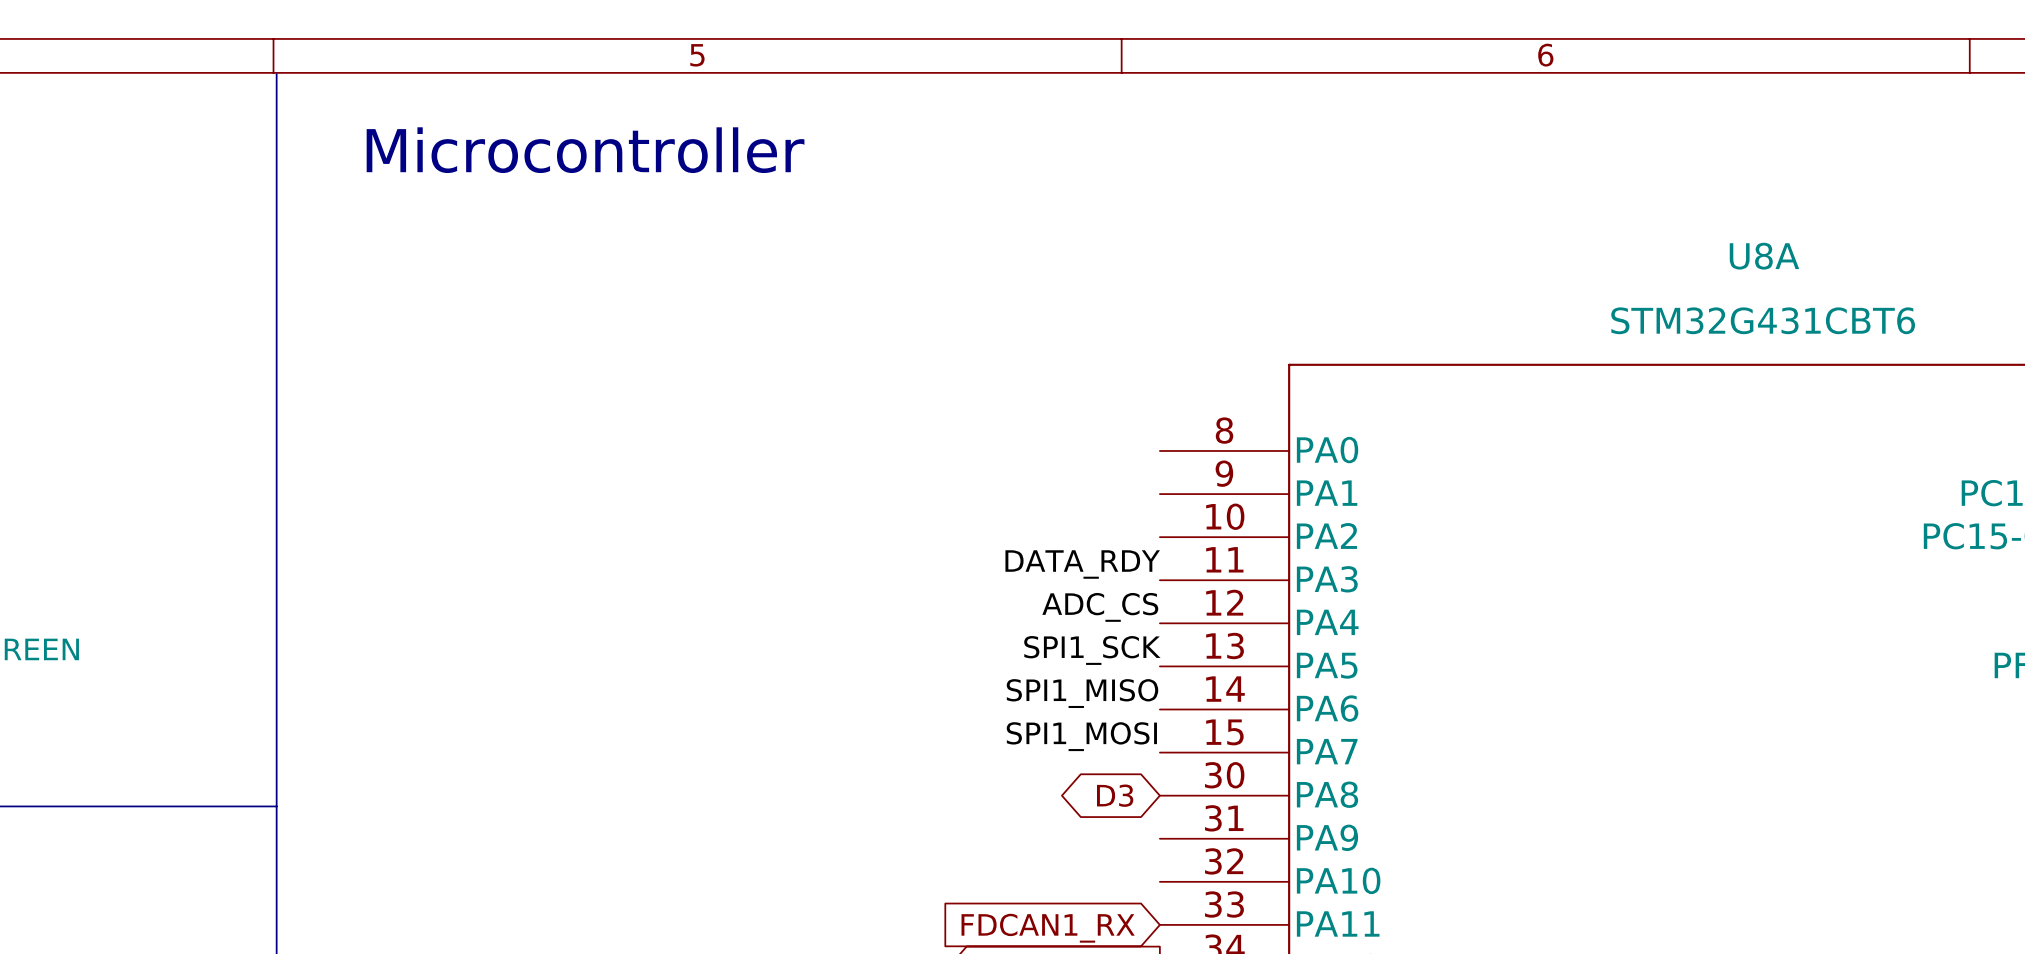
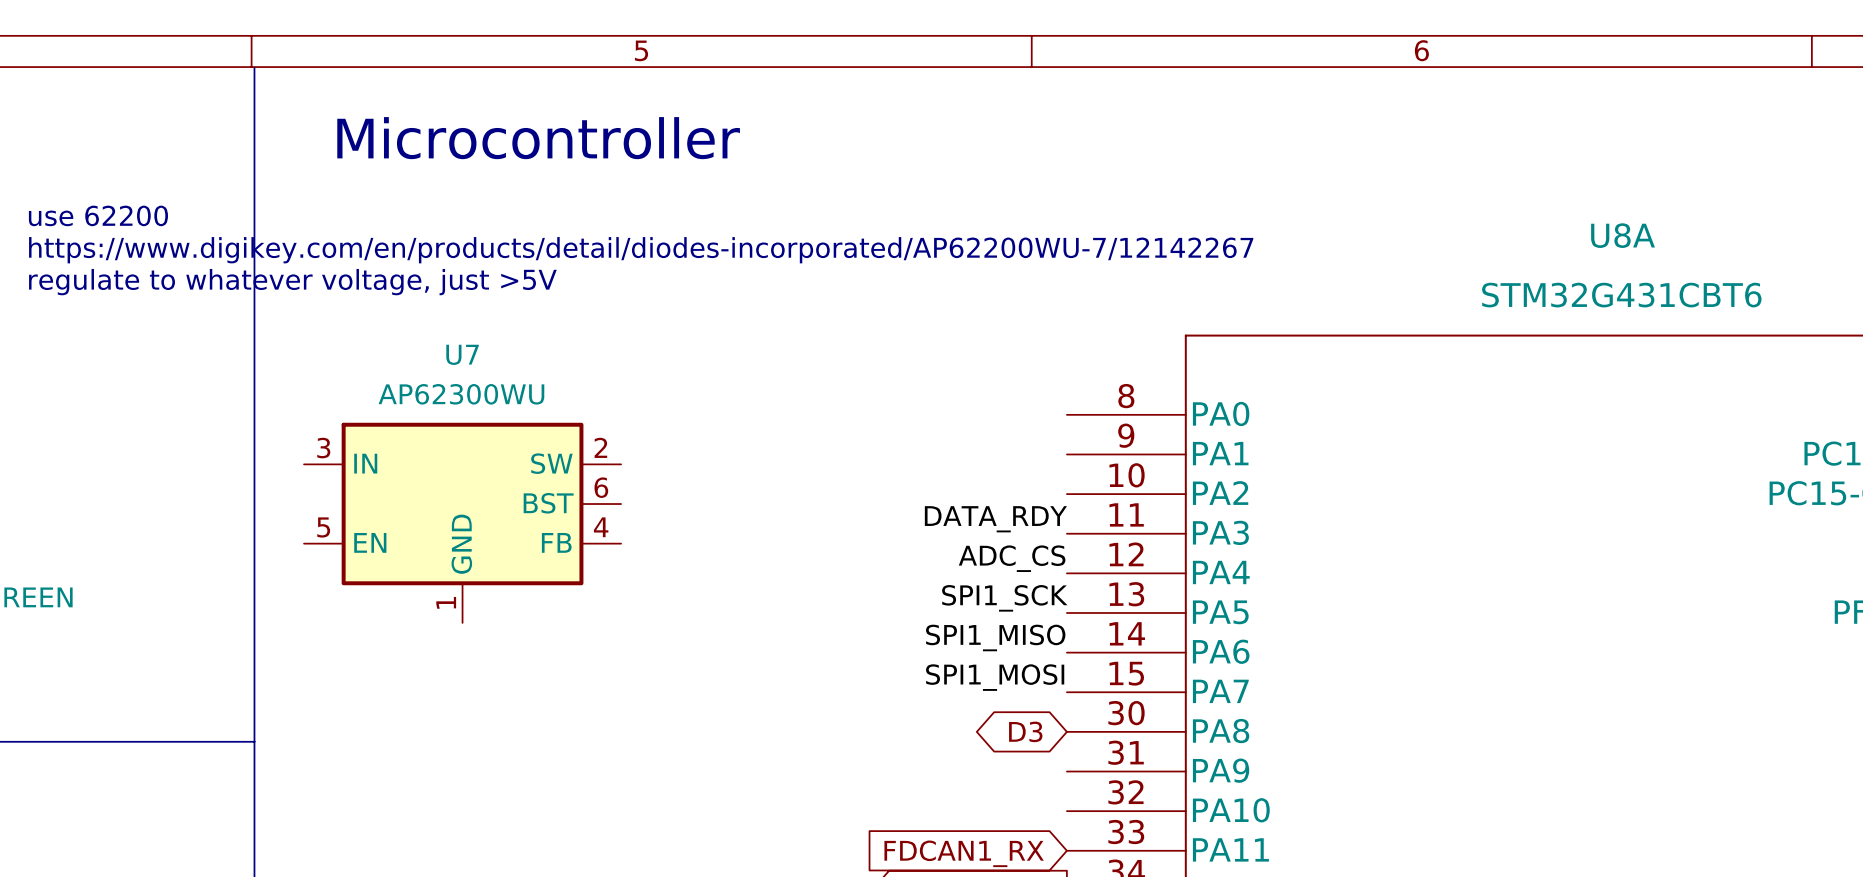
text: none -> use 62200 (98, 215)
text: none -> https://www.digikey.com/en/products/detail/diodes-incorporated/AP62200WU-7/12142267 (641, 250)
text: none -> regulate to whatever voltage, just >5V (292, 282)
U7: none -> AP62300WU (462, 522)

